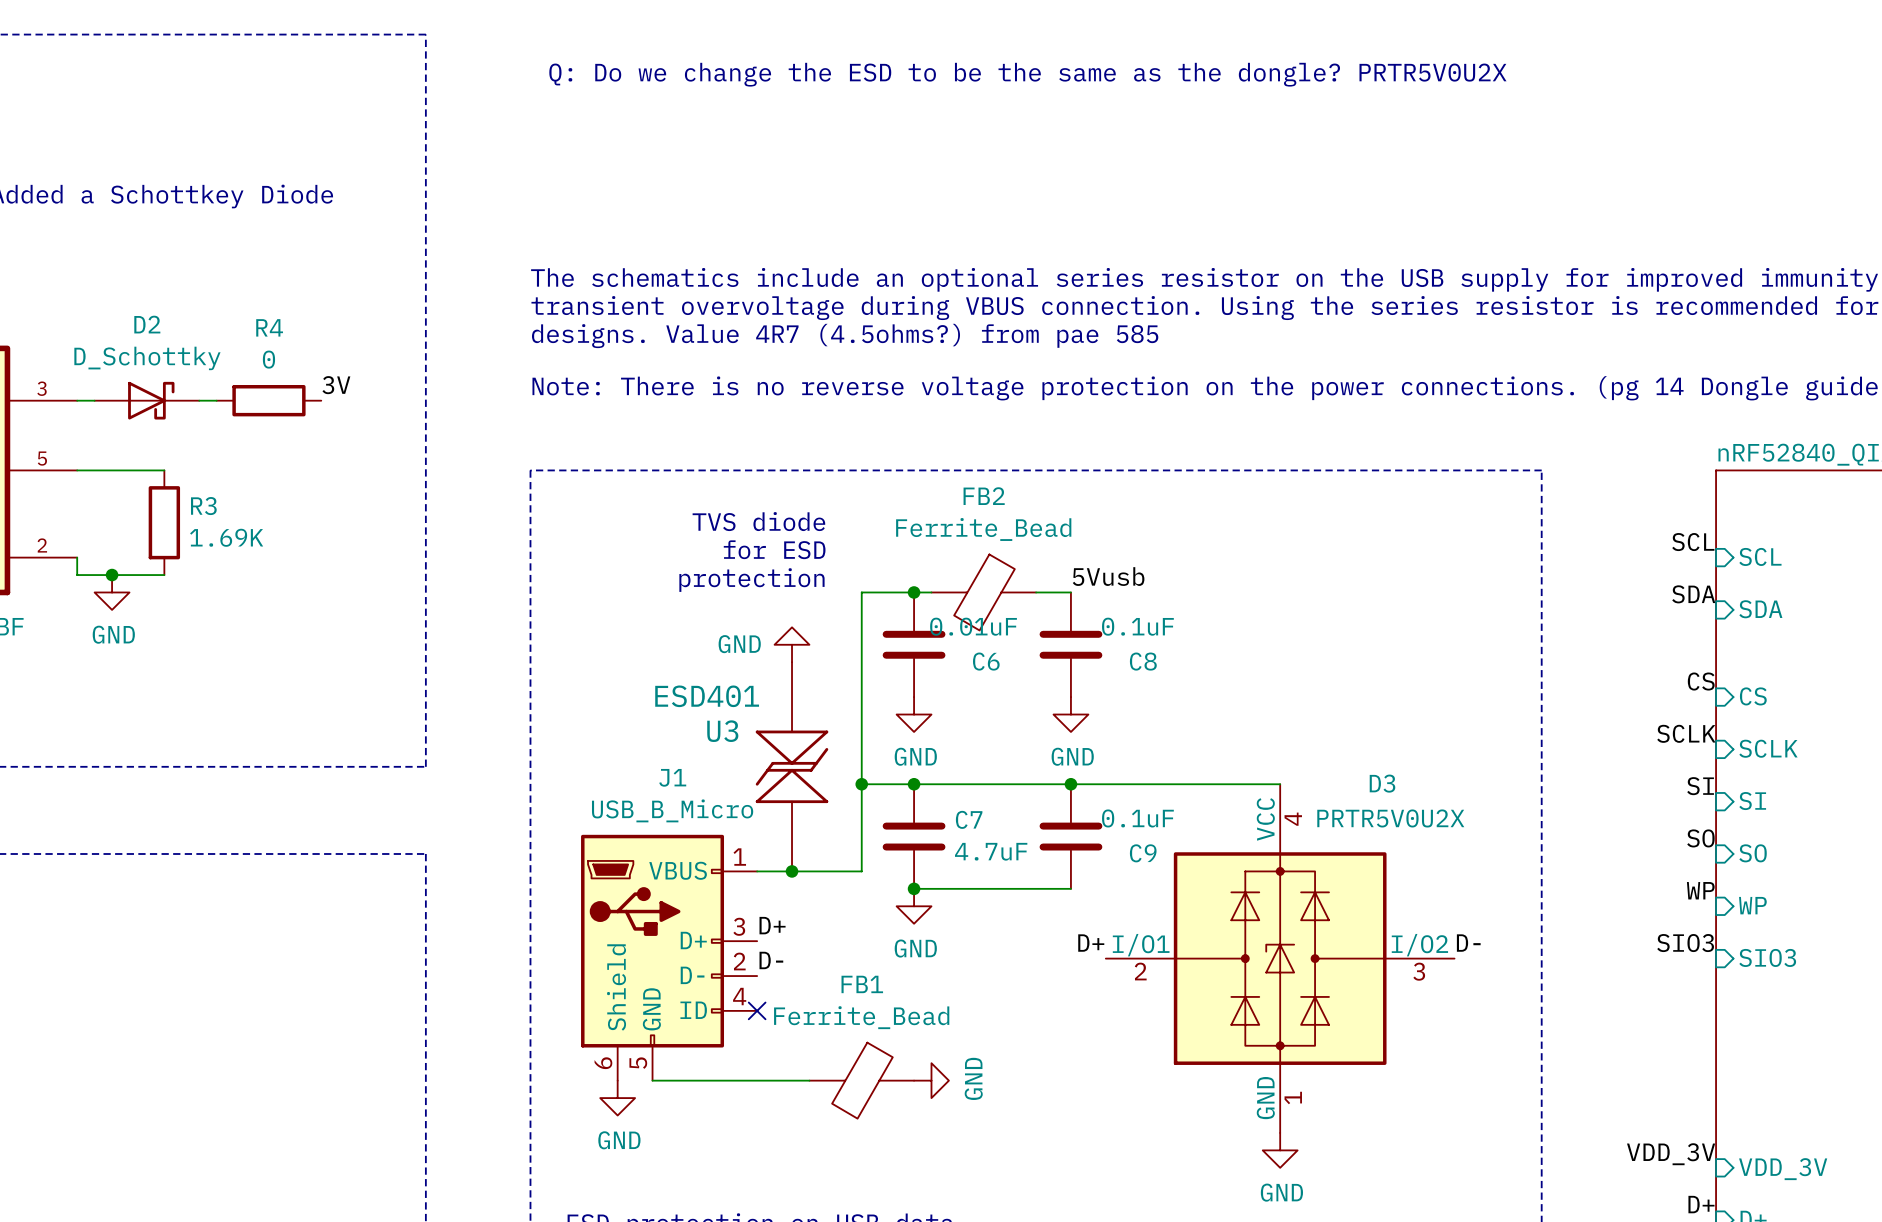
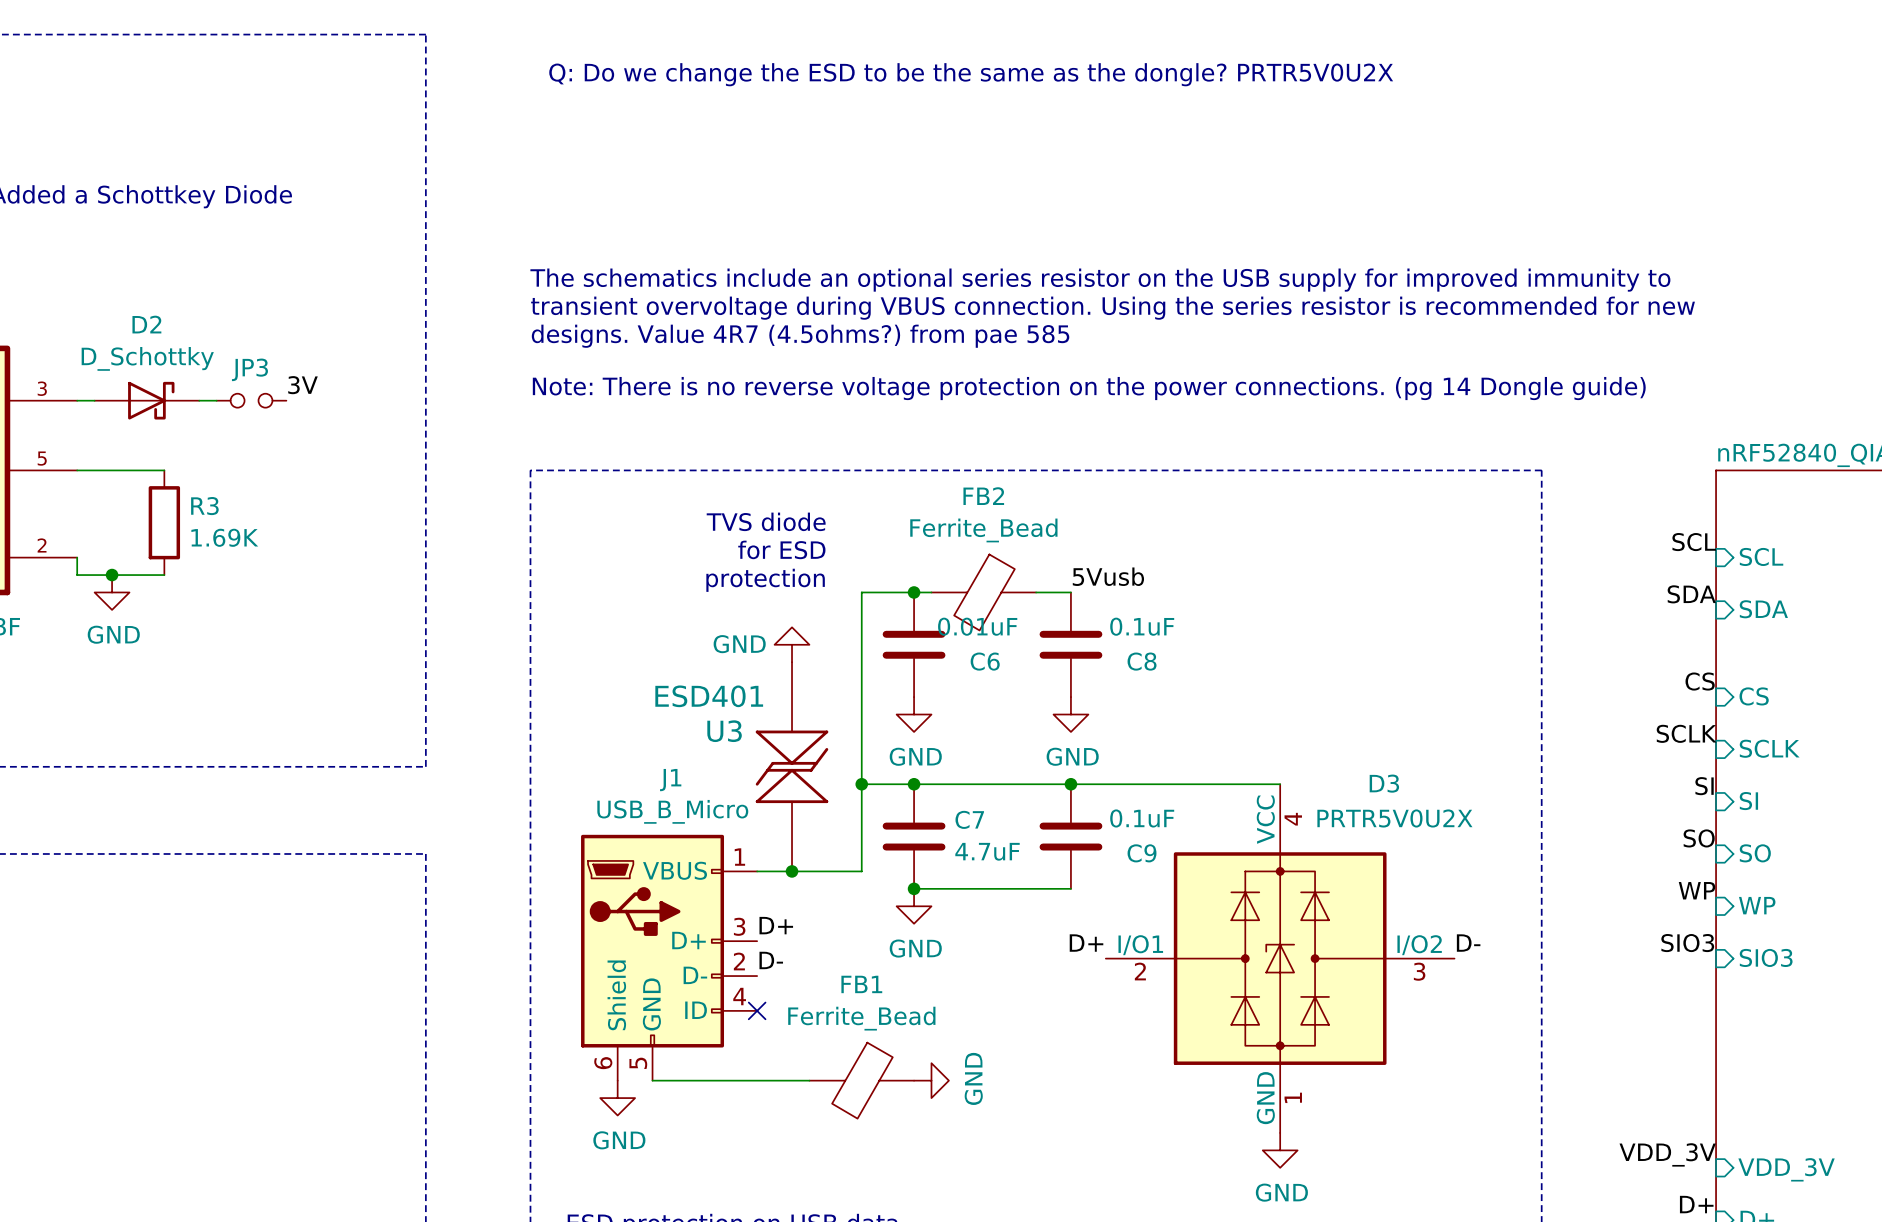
label position: 3V (336, 385) -> 3V (303, 385)
JP3: none -> (251, 400)
R4: 0 (268, 400) -> none

